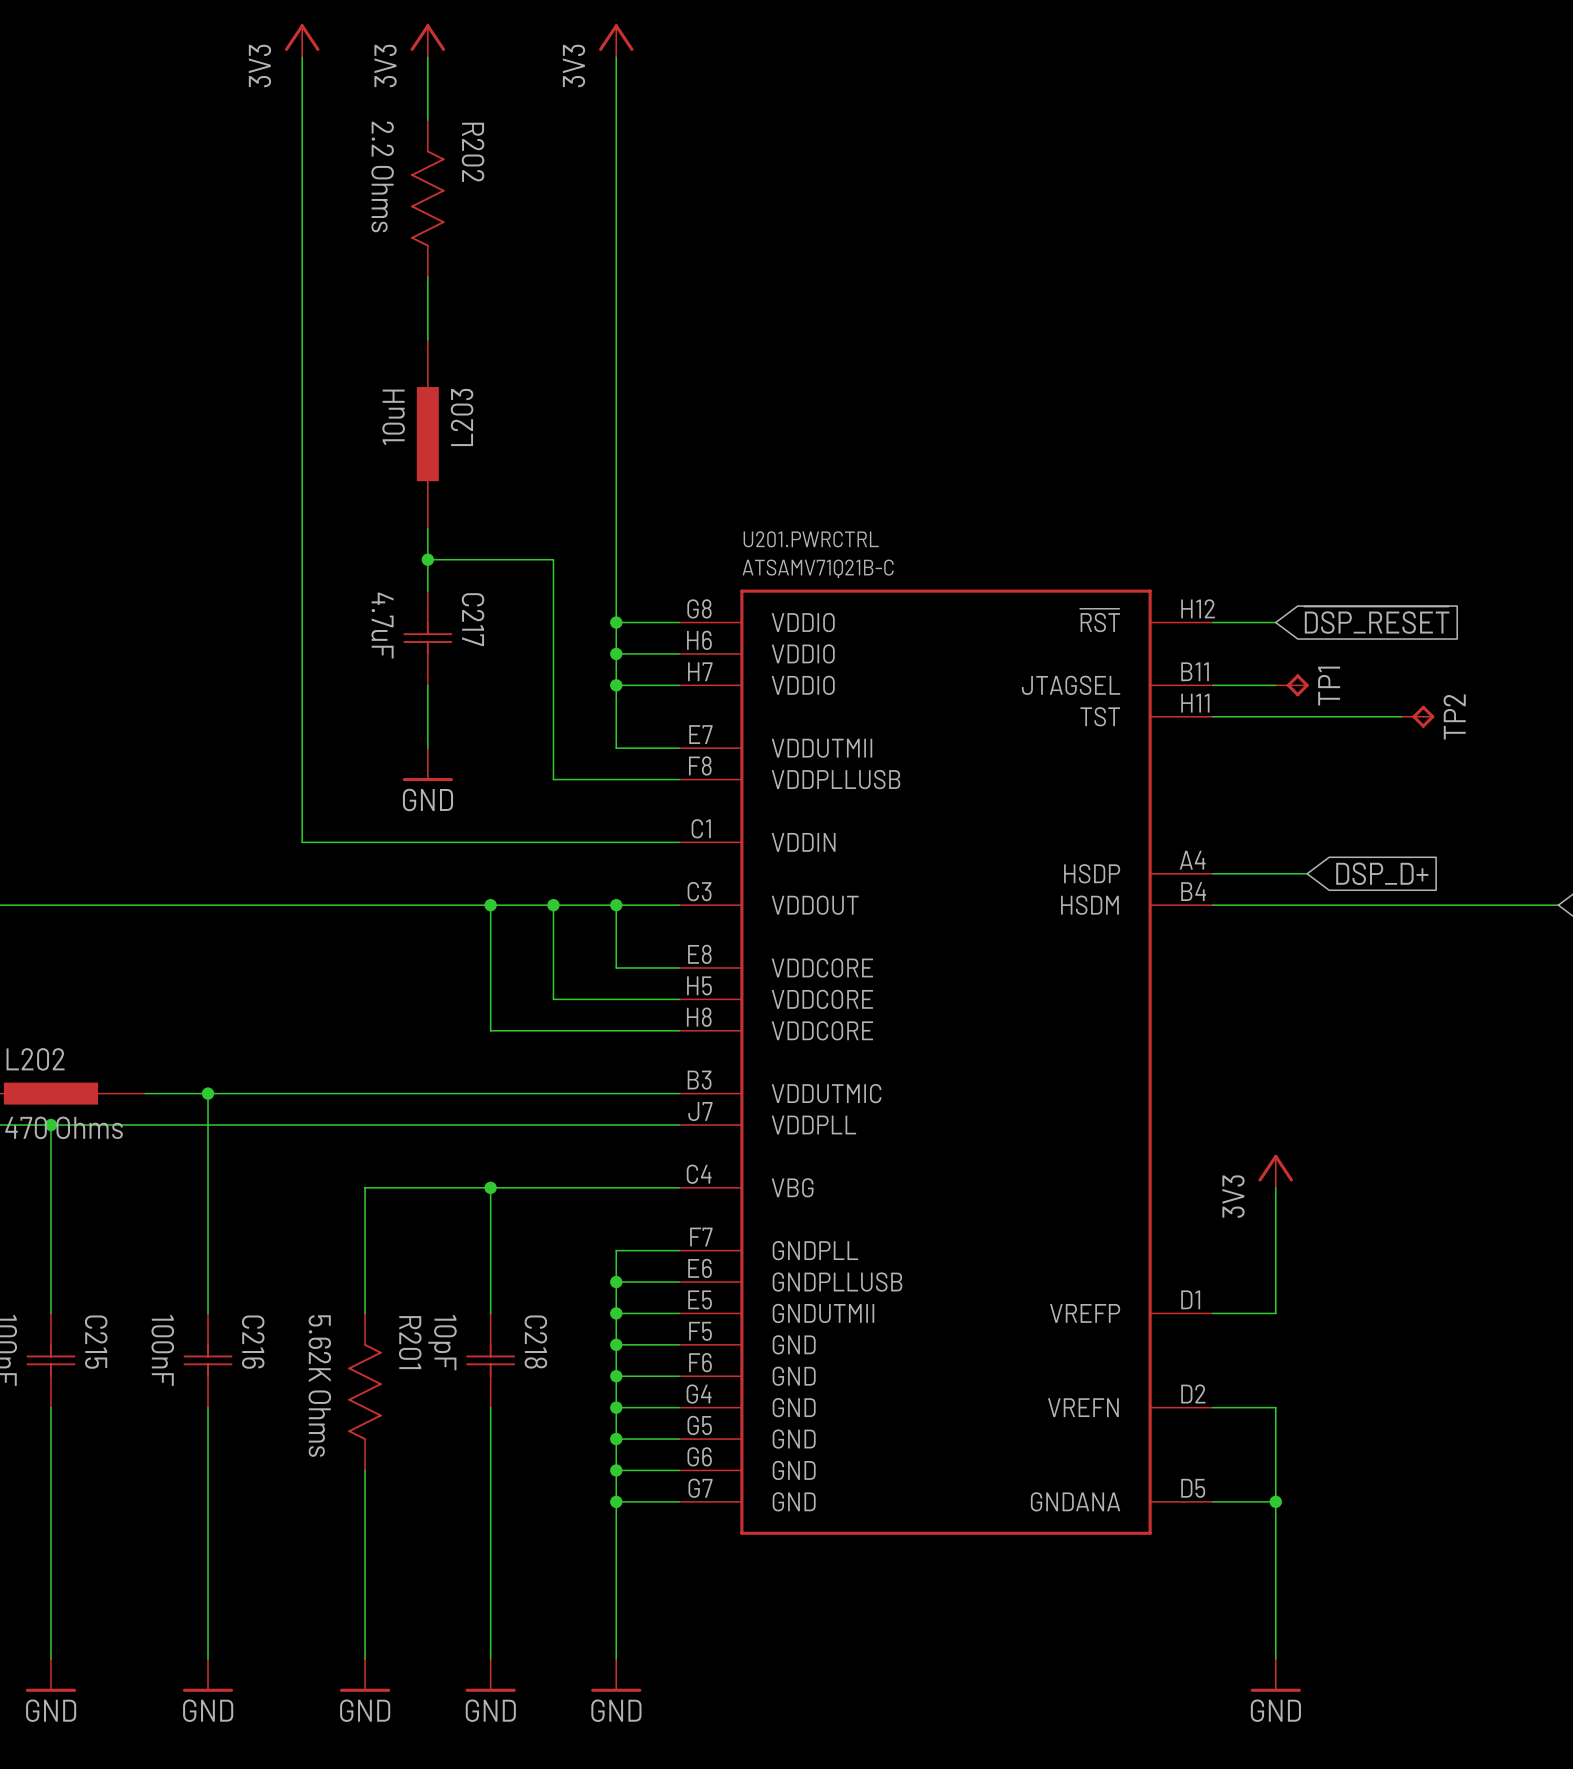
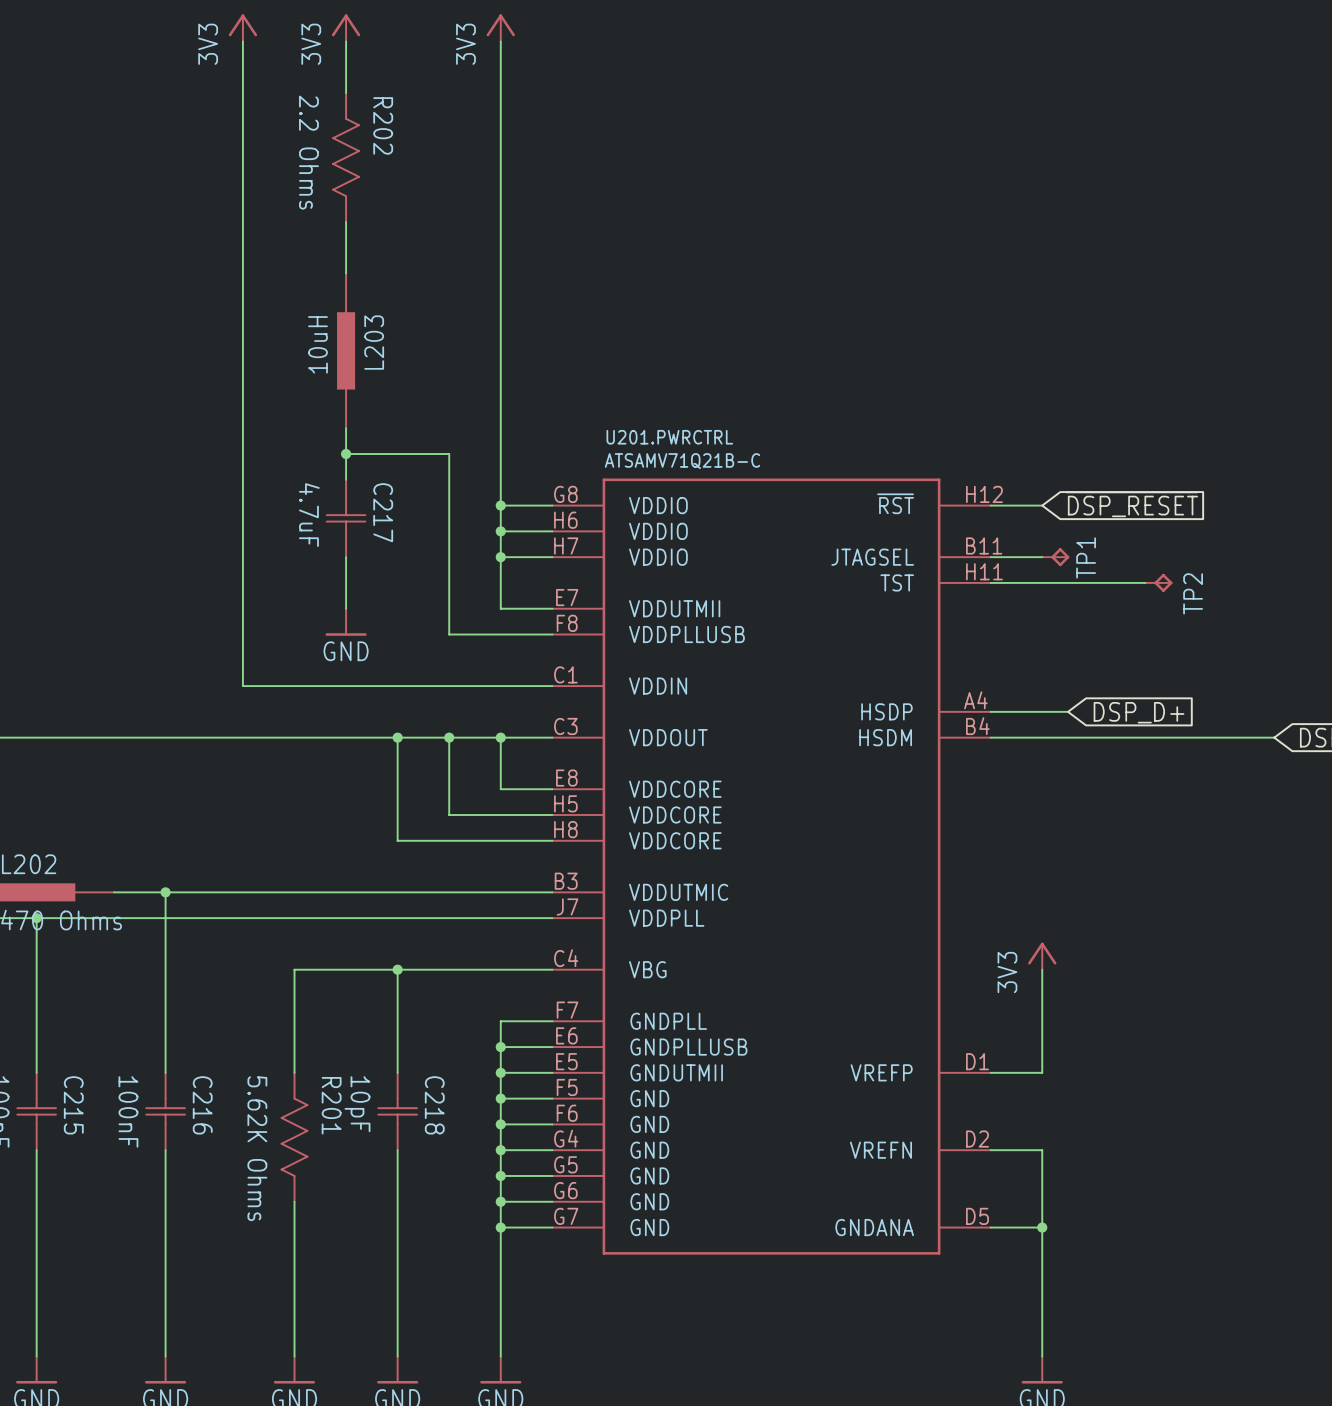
TP2 name position: TP2 (1454, 716) -> TP2 (1193, 593)

